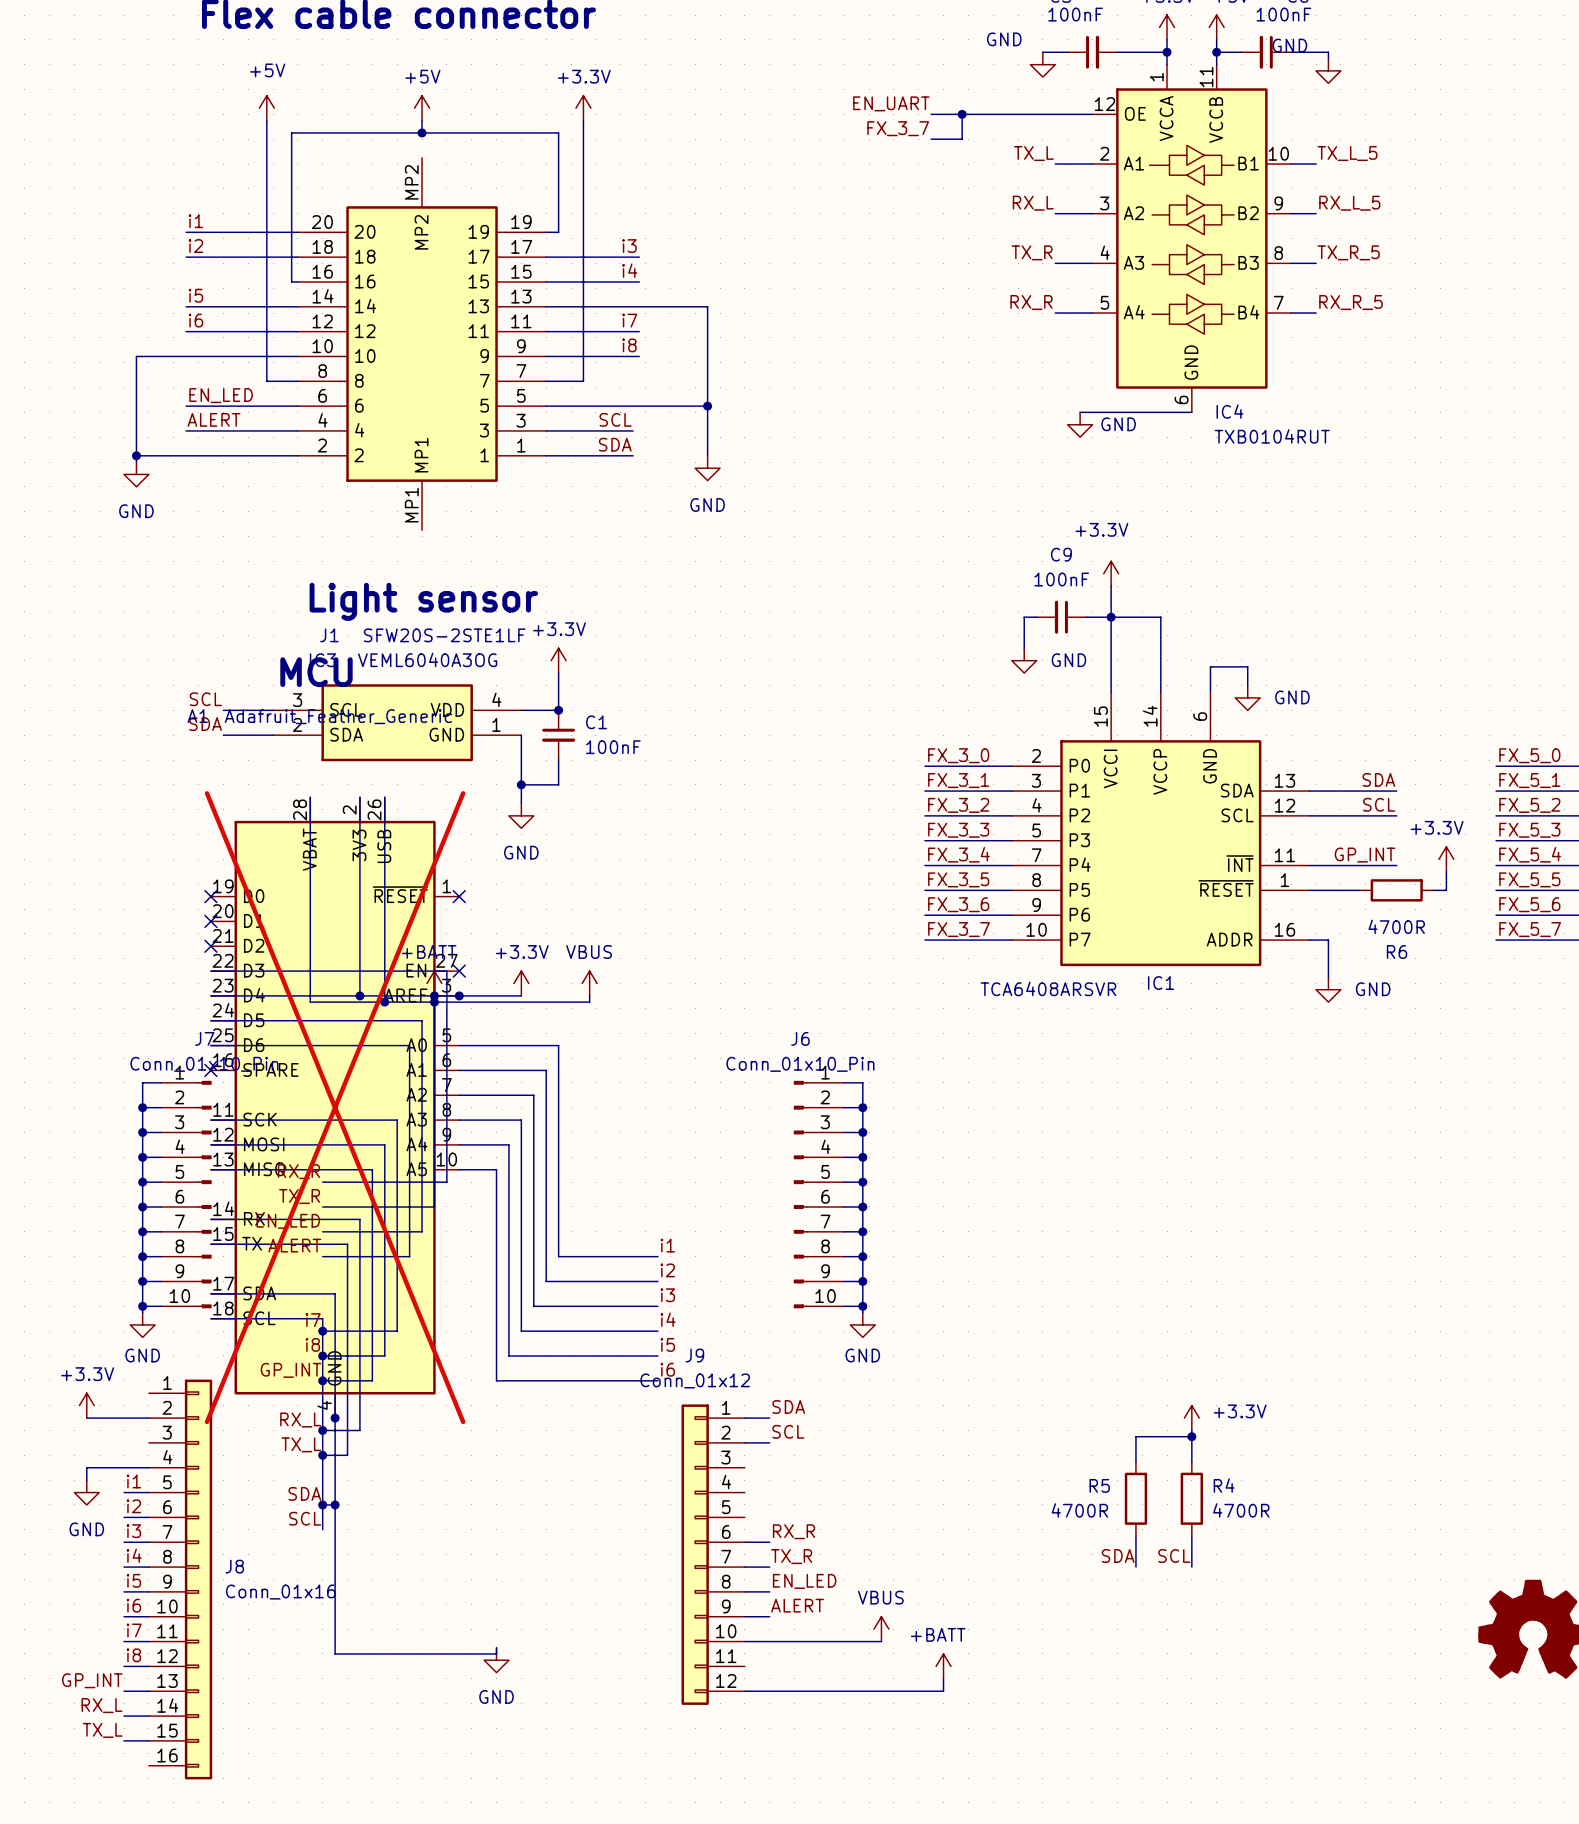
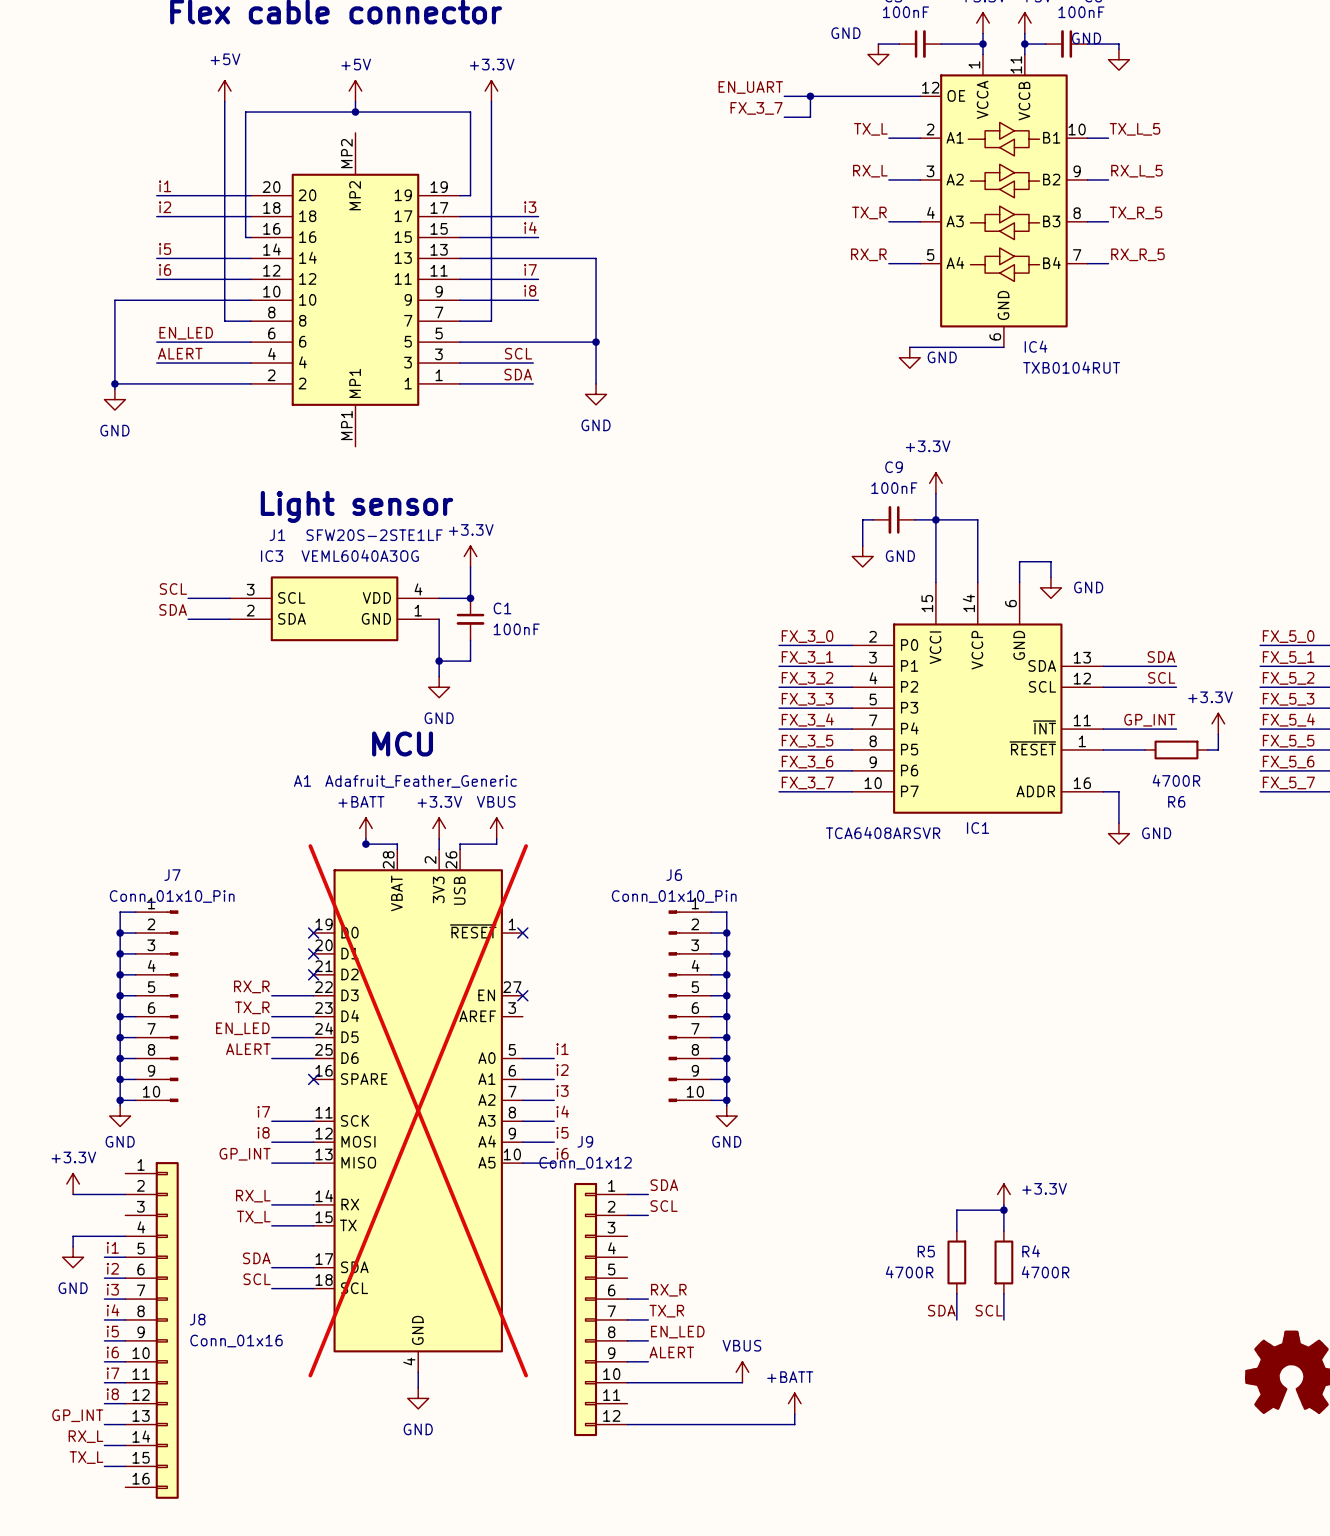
wire: (310, 797) (310, 1002) (434, 1002) (434, 1206) (372, 1206) -> none
wire: (359, 797) (359, 995) -> none
wire: (384, 797) (384, 1002) -> none
no-connect mark: (210, 896) -> none
no-connect mark: (459, 896) -> none
no-connect mark: (210, 921) -> none
no-connect mark: (210, 946) -> none
wire: (210, 971) (446, 971) (446, 1182) (372, 1182) -> none
no-connect mark: (459, 971) -> none
wire: (210, 995) (521, 995) -> (439, 849) (439, 838)
junction: (359, 995) -> none
junction: (434, 995) -> none
junction: (459, 995) -> none
junction: (384, 1002) -> none
wire: (471, 1002) (546, 1002) -> (397, 844) (397, 849)
wire: none -> (460, 844) (460, 849)
wire: (210, 1045) (409, 1045) (409, 1256) (372, 1256) -> none
no-connect mark: (210, 1070) -> none
A1 position: (335, 1107) -> (418, 1110)
no-connect mark: none -> (313, 933)
no-connect mark: none -> (522, 933)
no-connect mark: none -> (313, 953)
wire: (210, 1144) (384, 1144) (384, 1355) (372, 1355) -> none
no-connect mark: none -> (313, 974)
wire: (210, 1169) (372, 1169) (372, 1380) -> none
no-connect mark: none -> (522, 995)
wire: (210, 1219) (359, 1219) (359, 1430) -> (313, 1204) (303, 1204)
wire: (210, 1244) (347, 1244) (347, 1455) -> (313, 1225) (292, 1225)
no-connect mark: none -> (313, 1079)
wire: (210, 1293) (335, 1293) (335, 1653) (496, 1653) (496, 1647) -> (418, 1372) (418, 1387)
wire: (210, 1318) (322, 1318) (322, 1529) -> (313, 1288) (271, 1288)
junction: (322, 1331) -> none
junction: (322, 1355) -> none
junction: (322, 1380) -> none
junction: (335, 1418) -> none
junction: (322, 1430) -> none
junction: (322, 1455) -> none
junction: (322, 1504) -> none
wire: none -> (282, 1267) (313, 1267)
junction: (335, 1504) -> none

